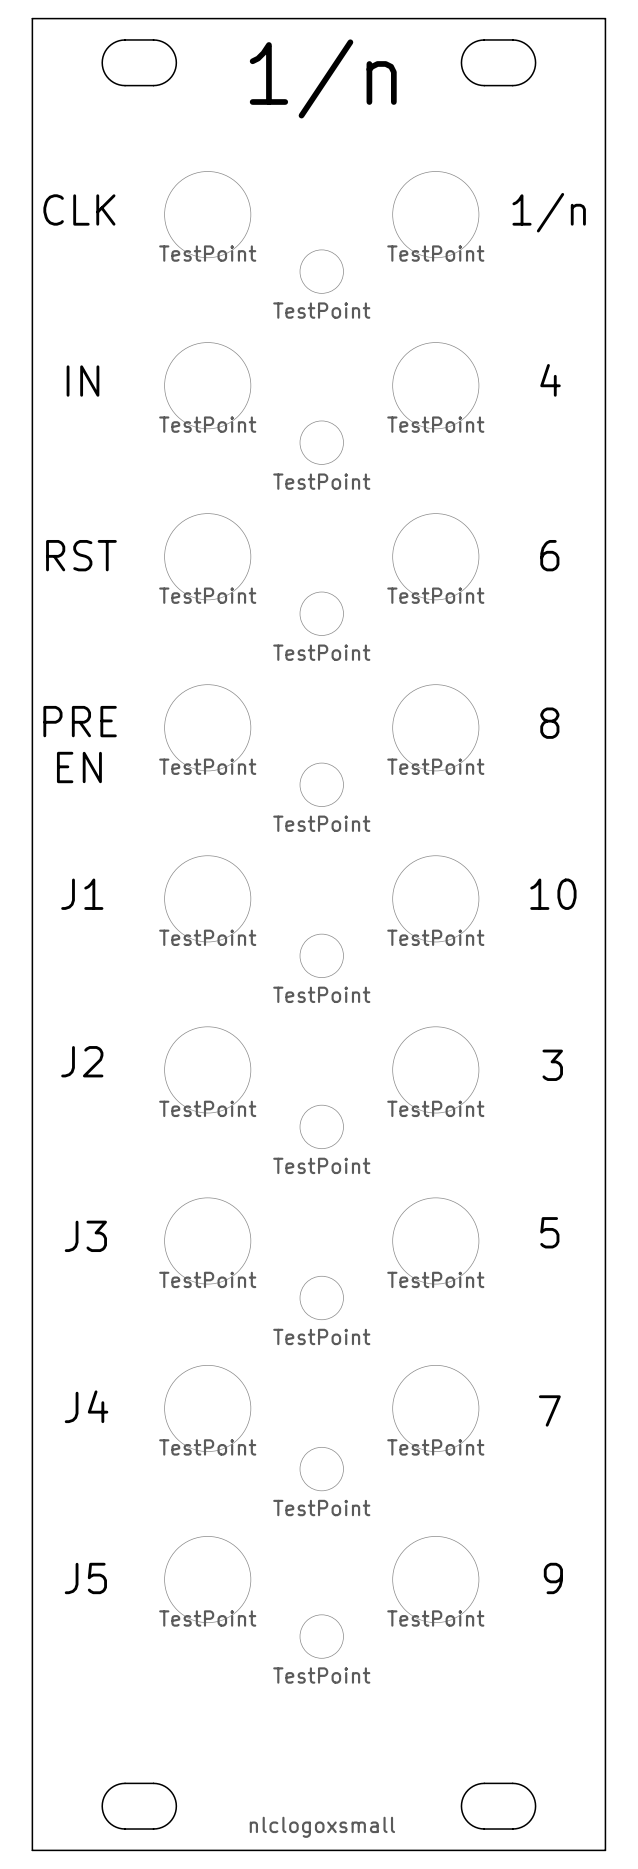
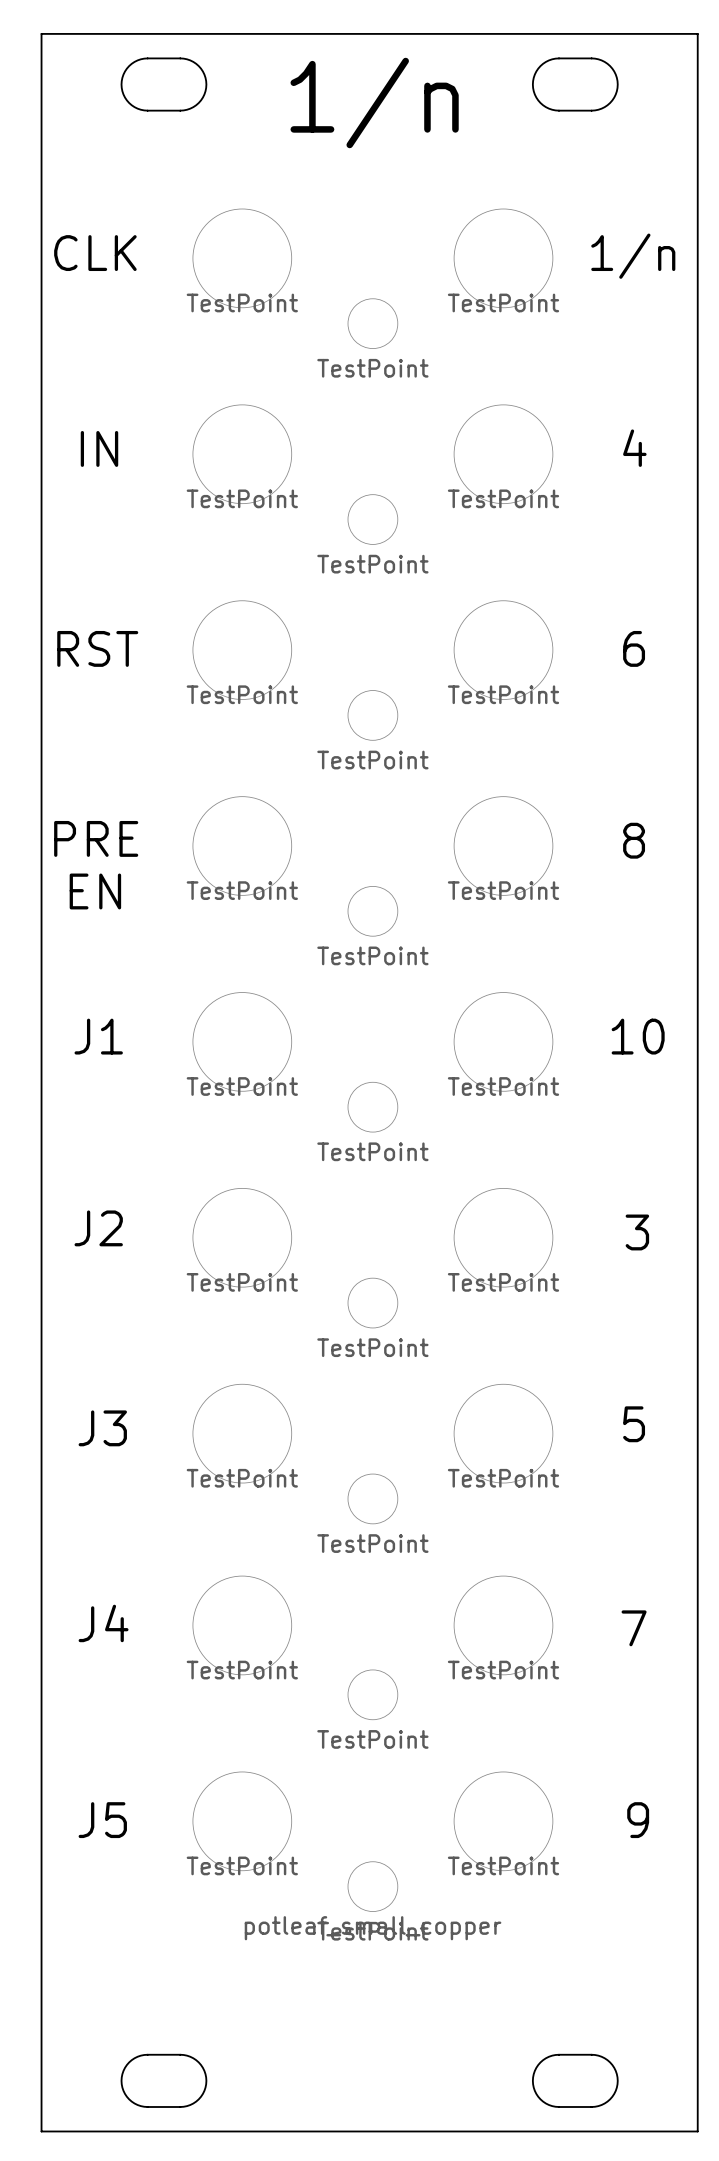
drawing: none -> [244, 1916, 502, 1941]
drawing: [249, 1816, 396, 1838] -> none

